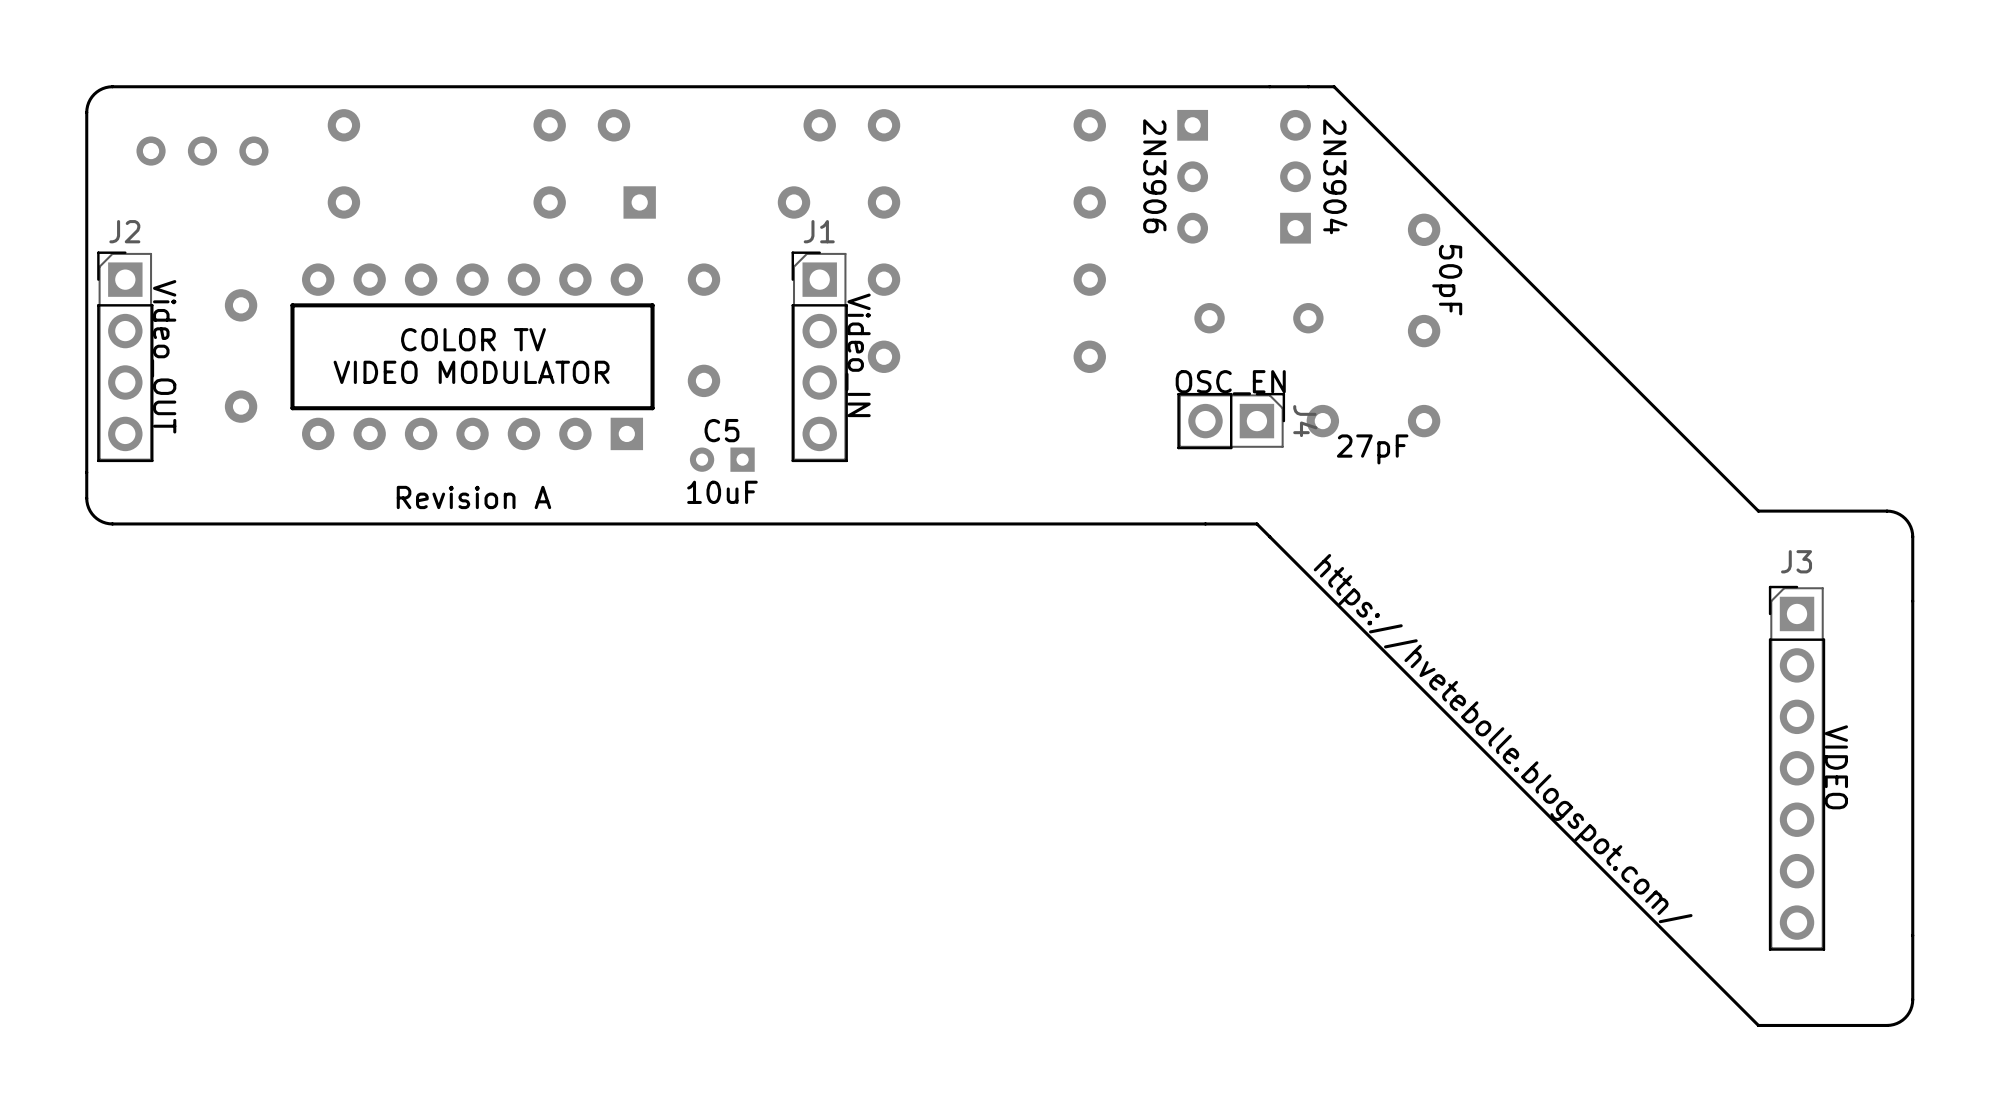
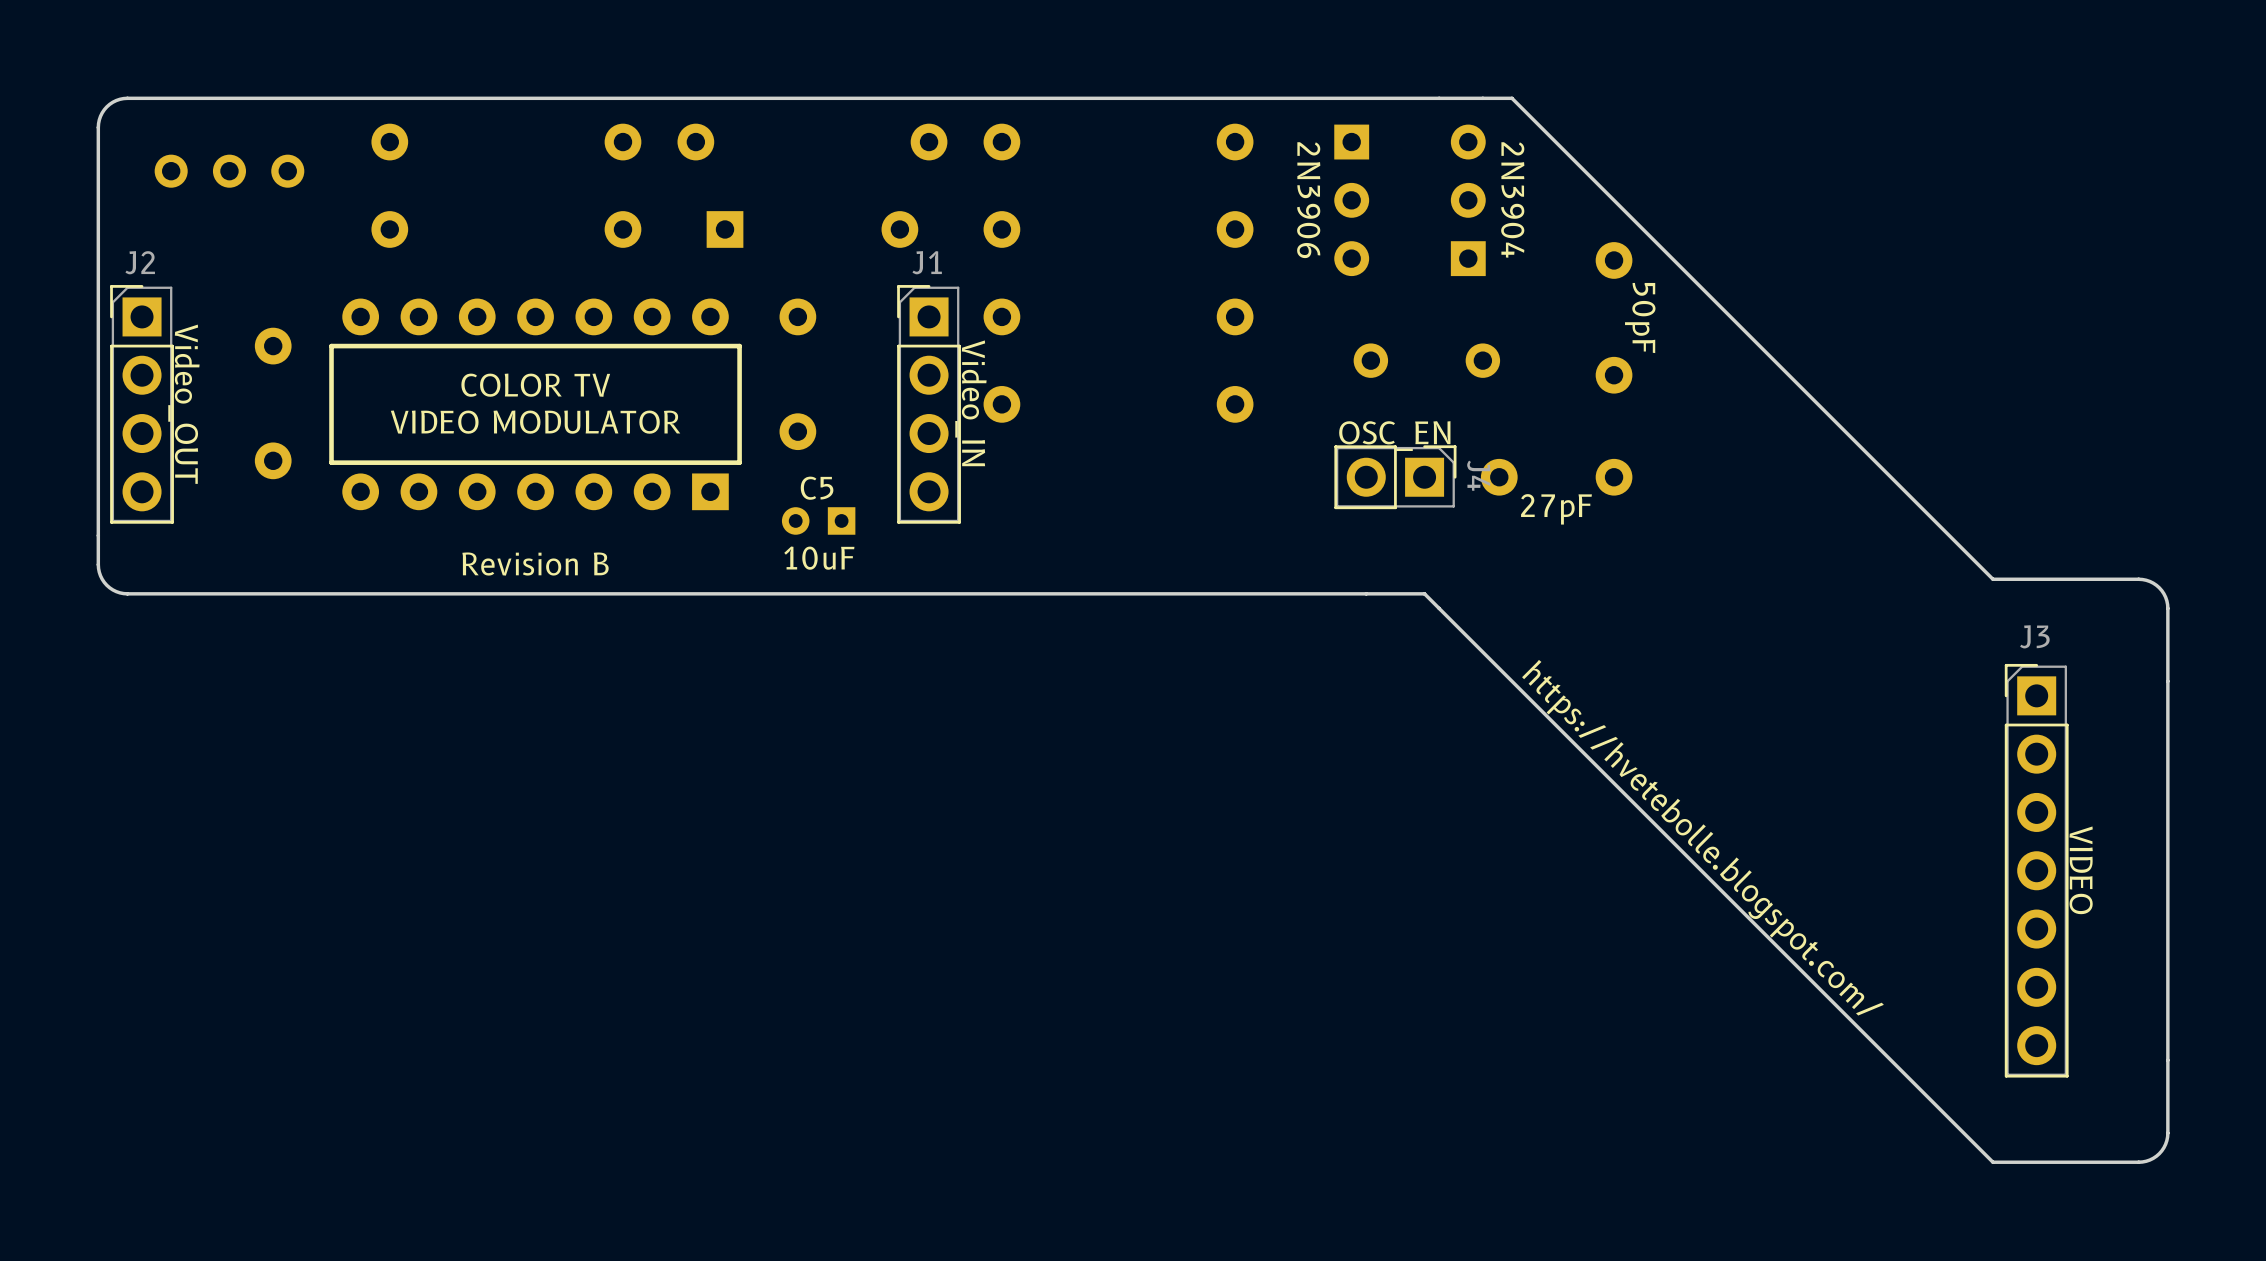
text: Revision A (473, 497) -> Revision B (535, 564)

